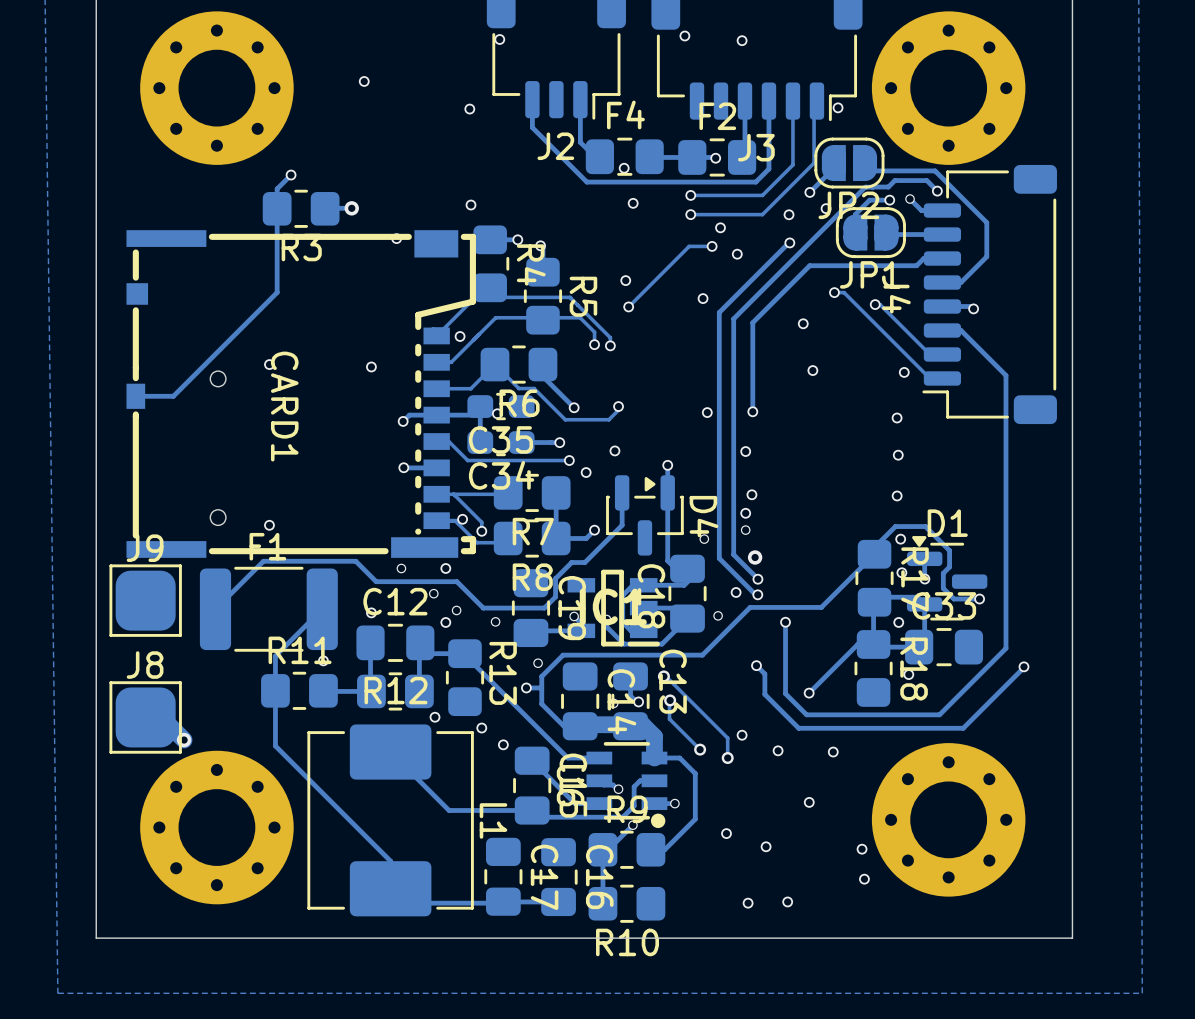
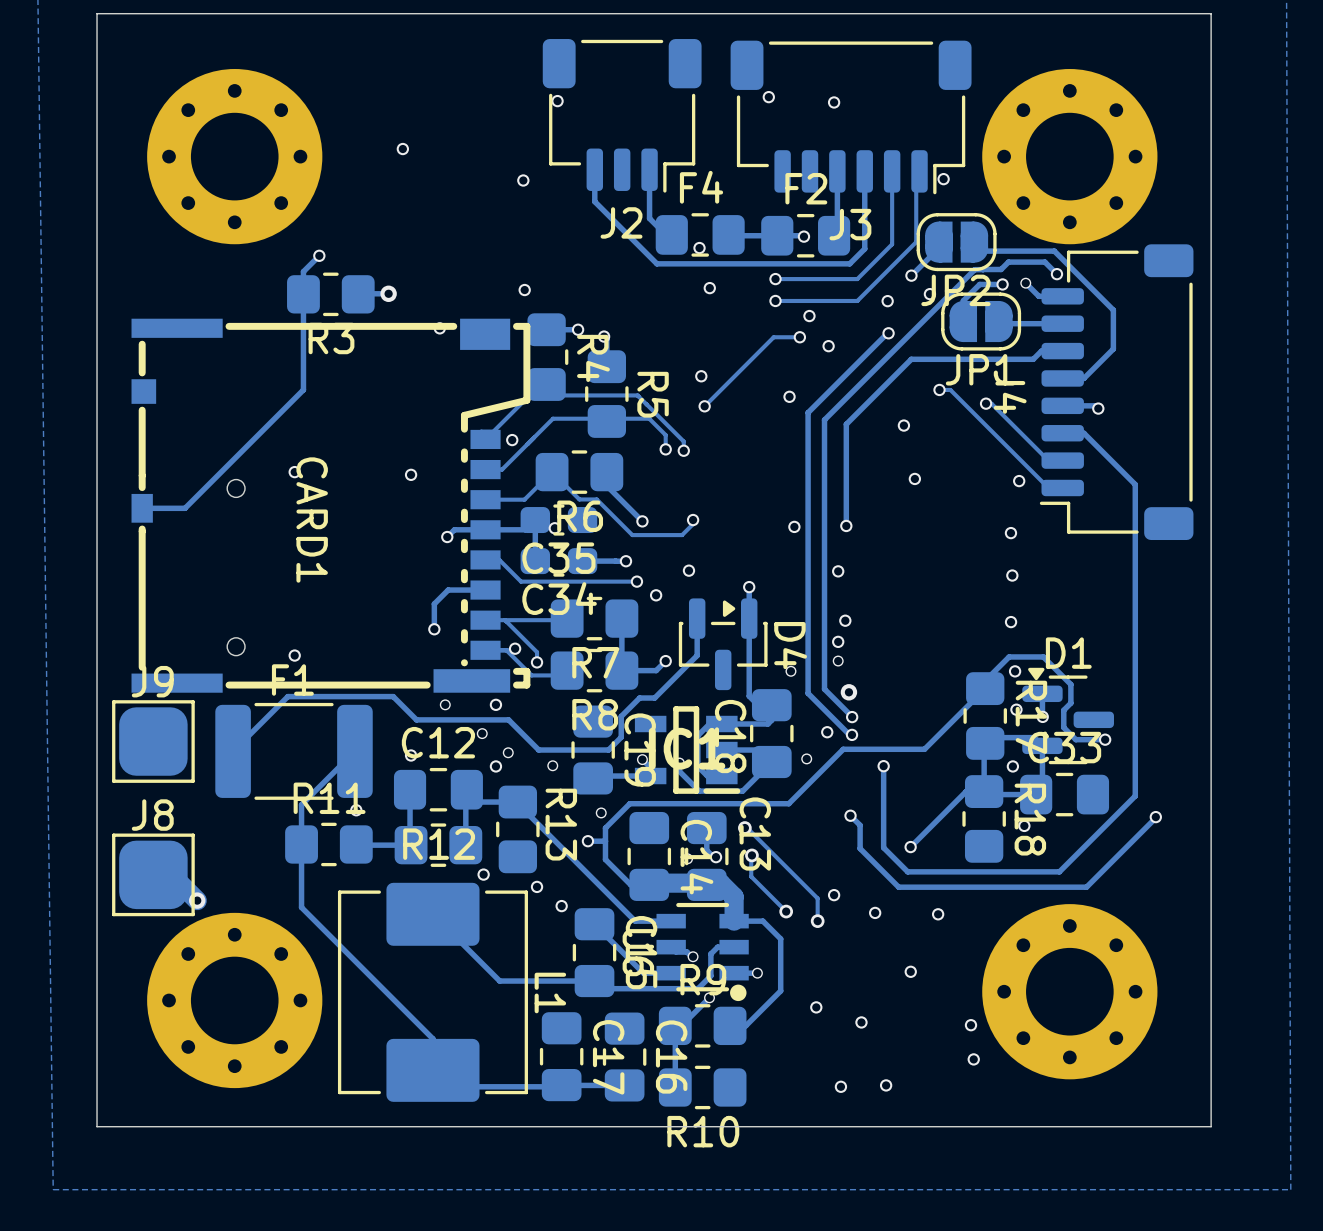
via position: (403, 467) -> (434, 629)
track: none -> (448, 590) (434, 603) (434, 629)

